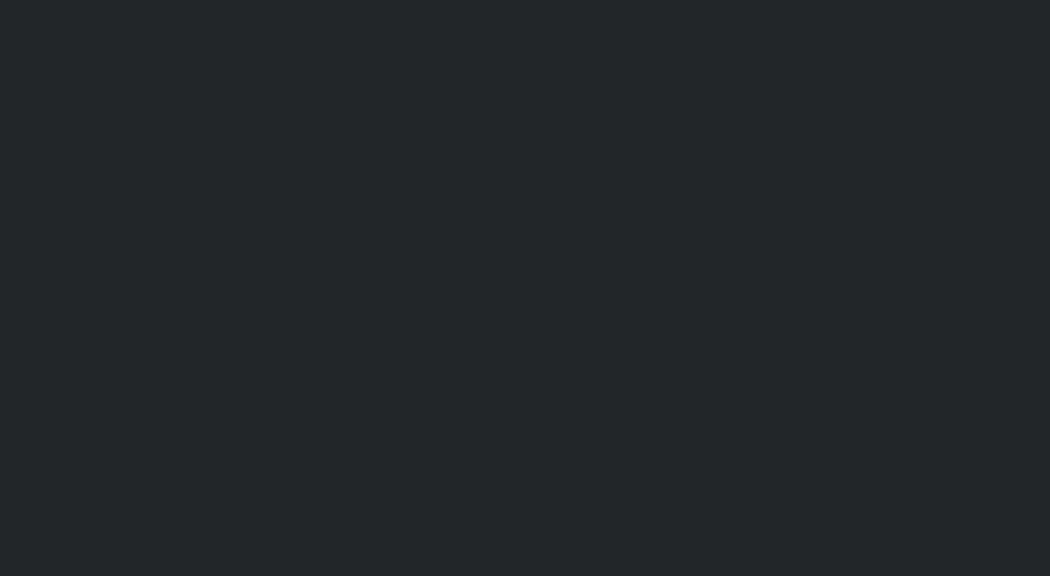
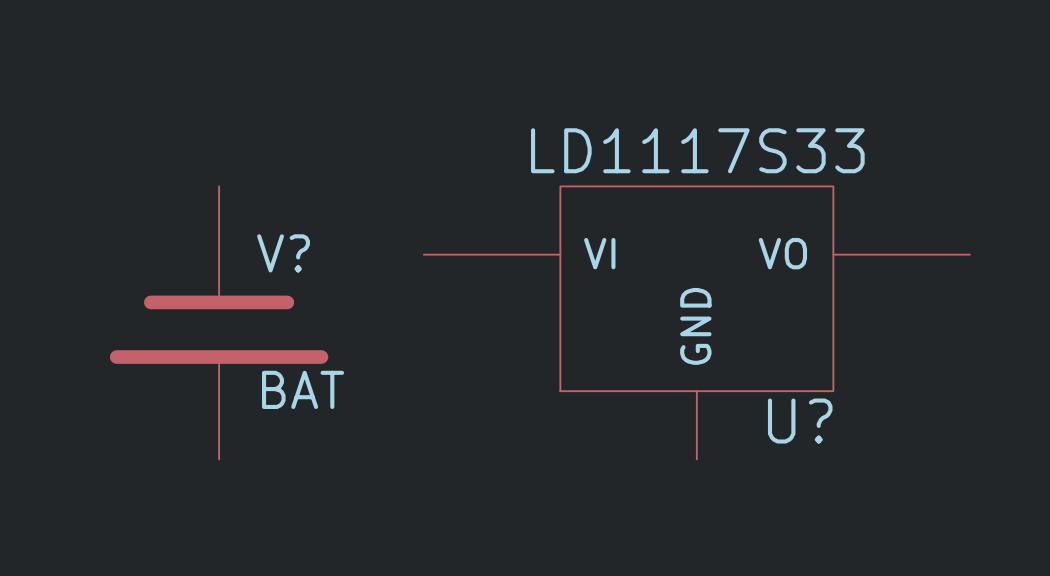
V?: none -> BAT (219, 322)
U?: none -> LD1117S33 (696, 322)

